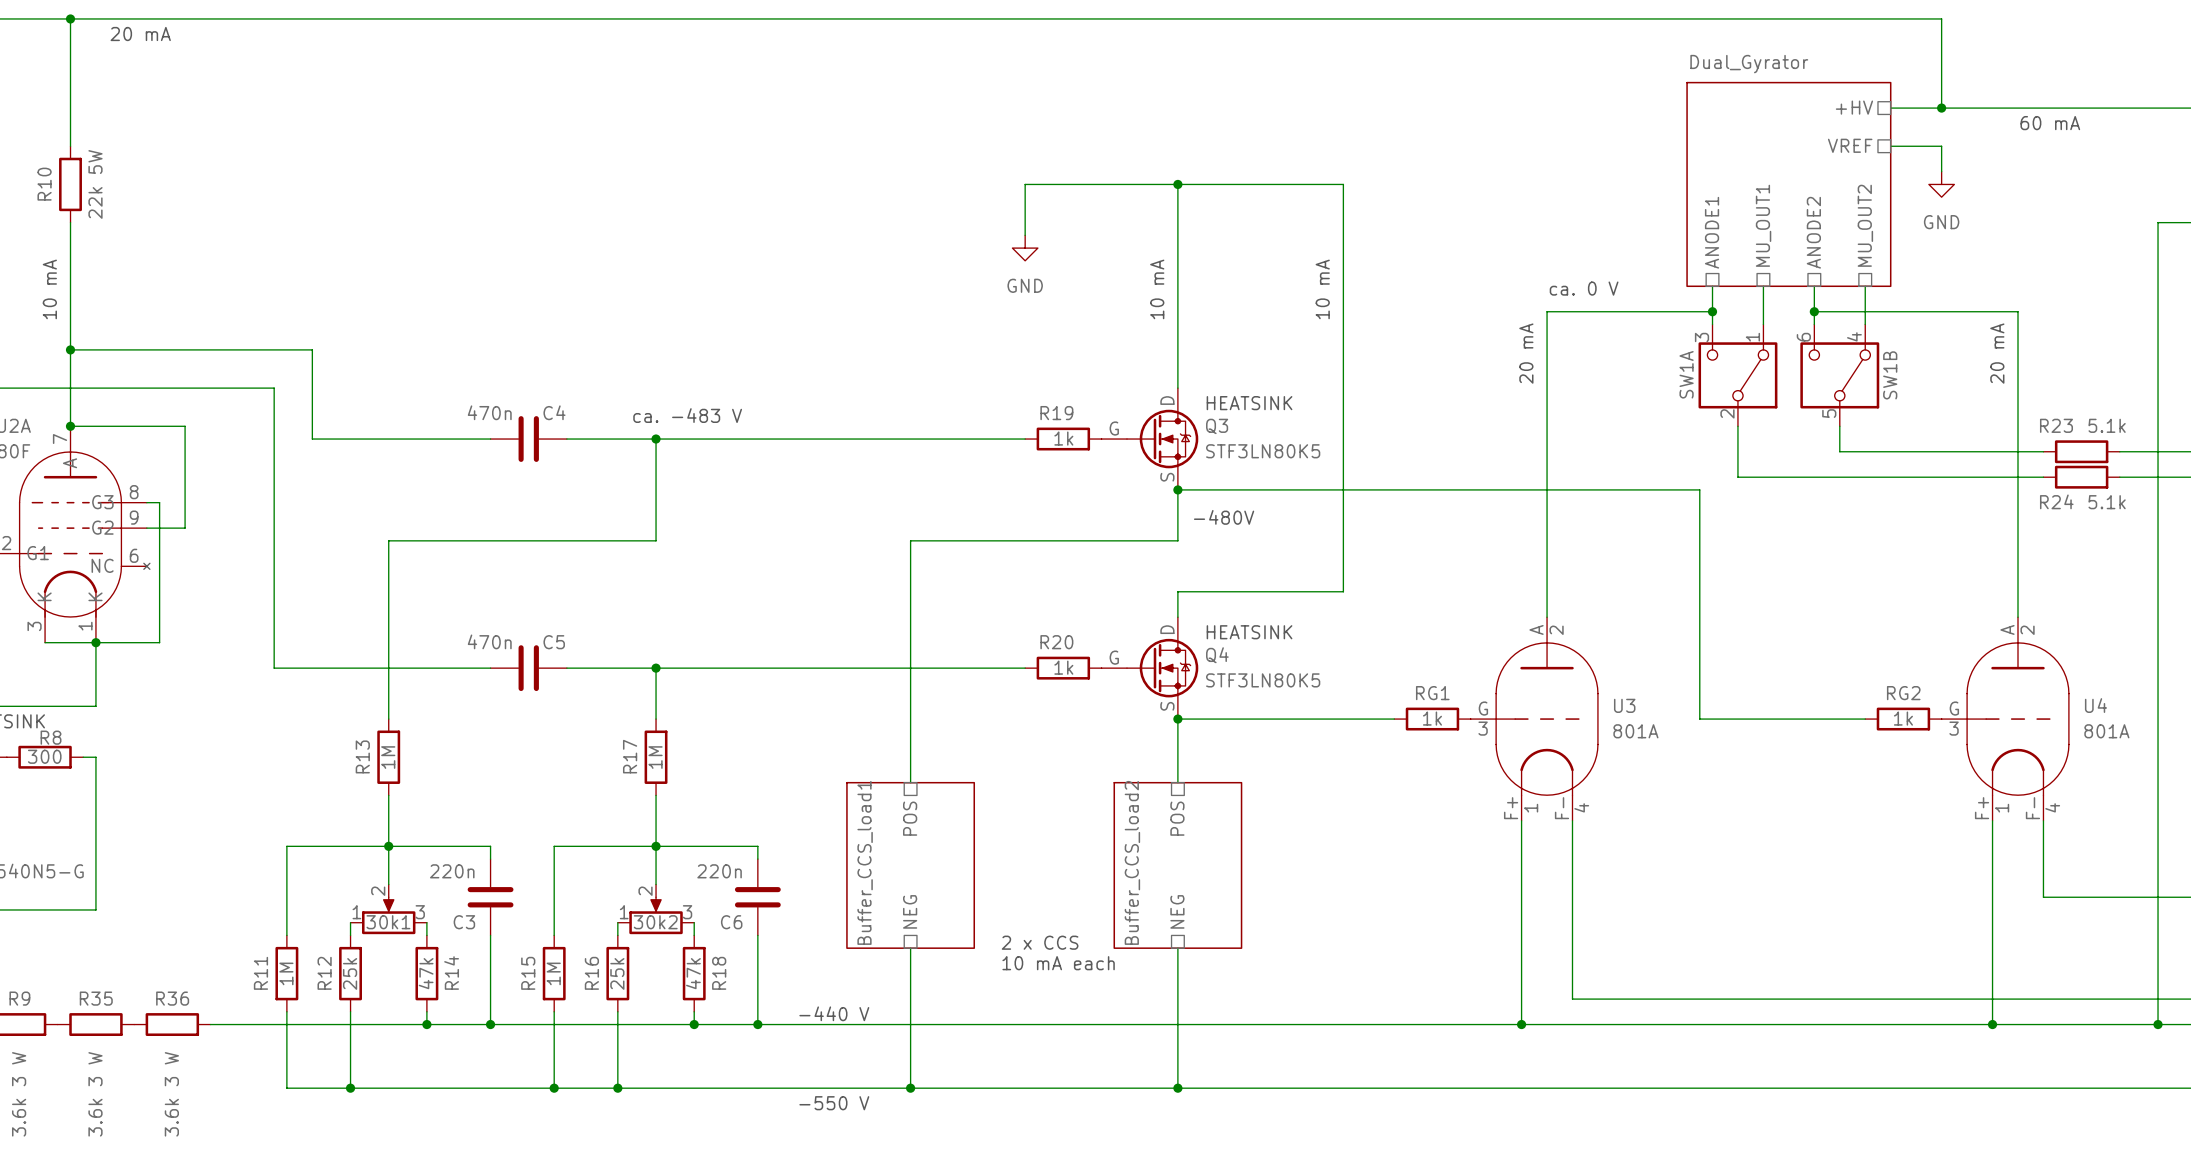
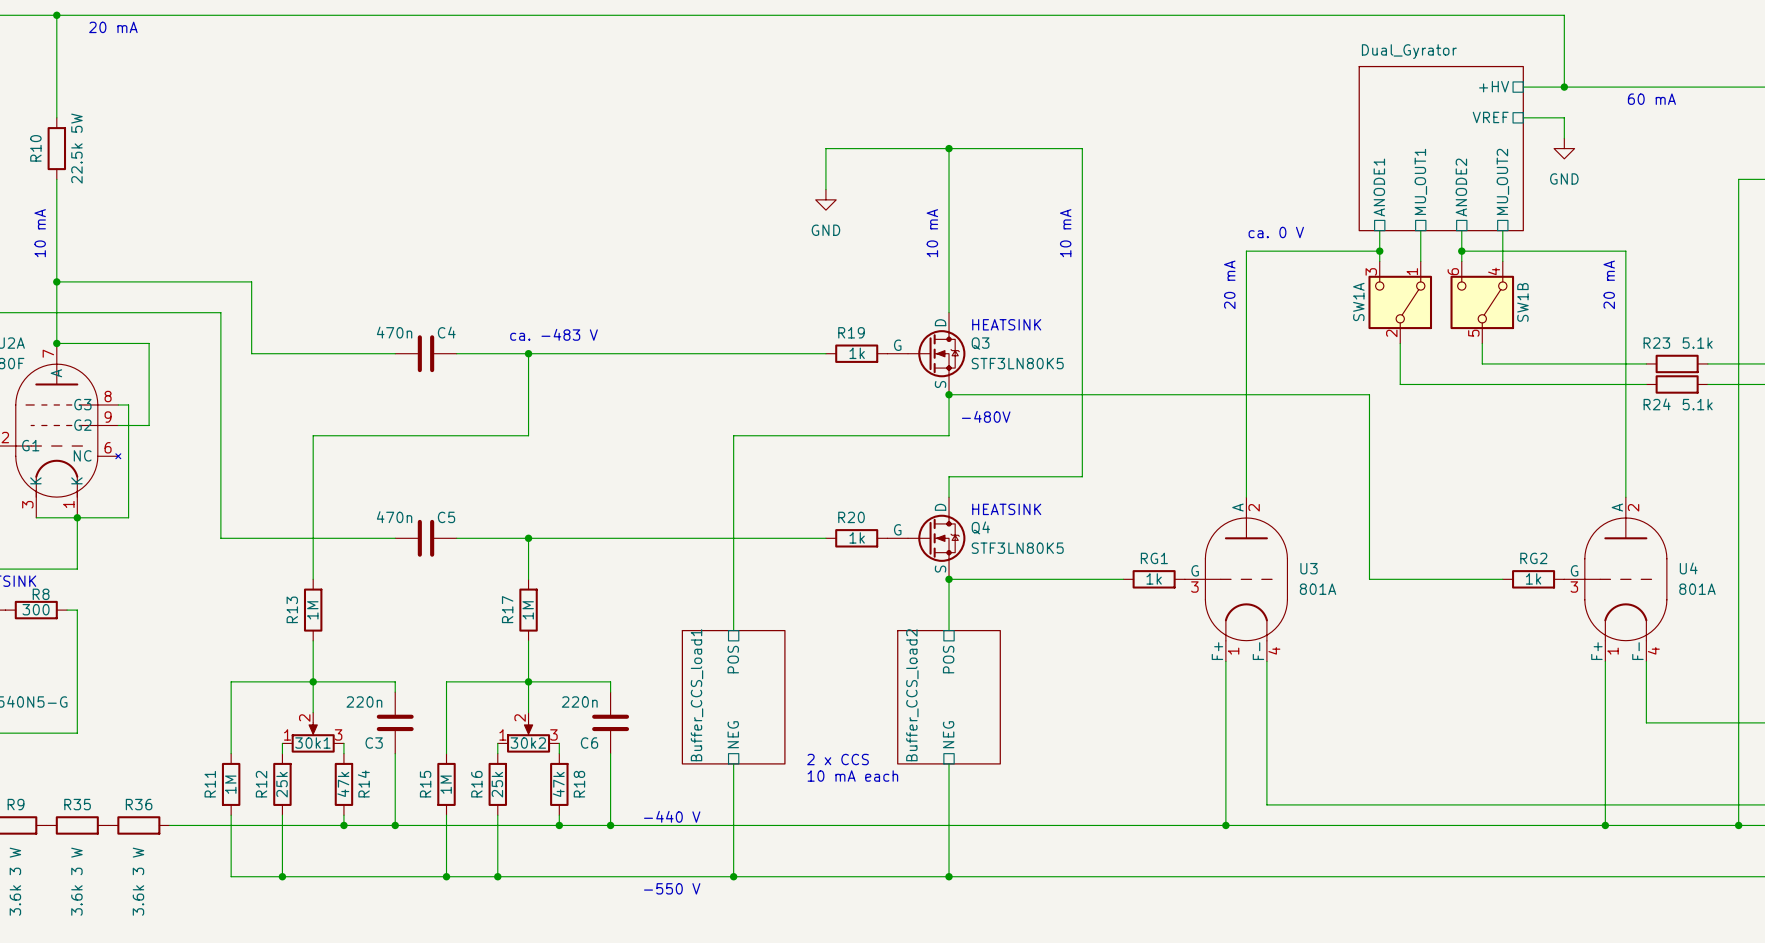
R10 value: 22k 5W (95, 184) -> 22.5k 5W (76, 148)

